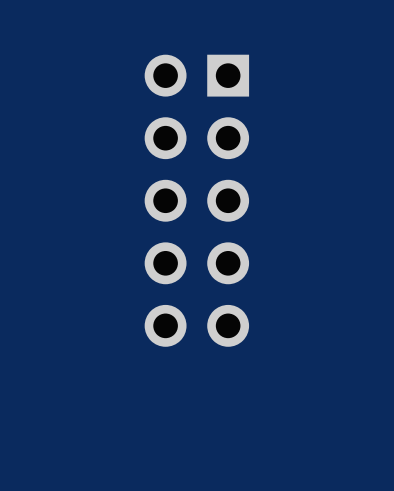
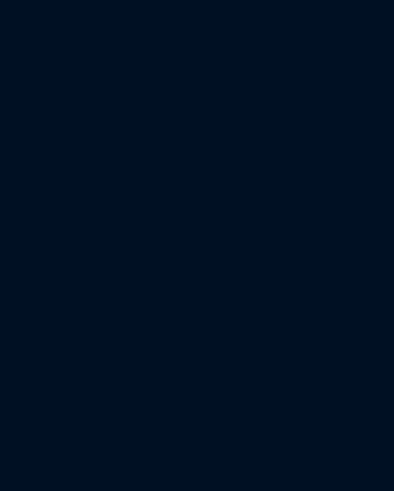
part: (196, 200) -> none

